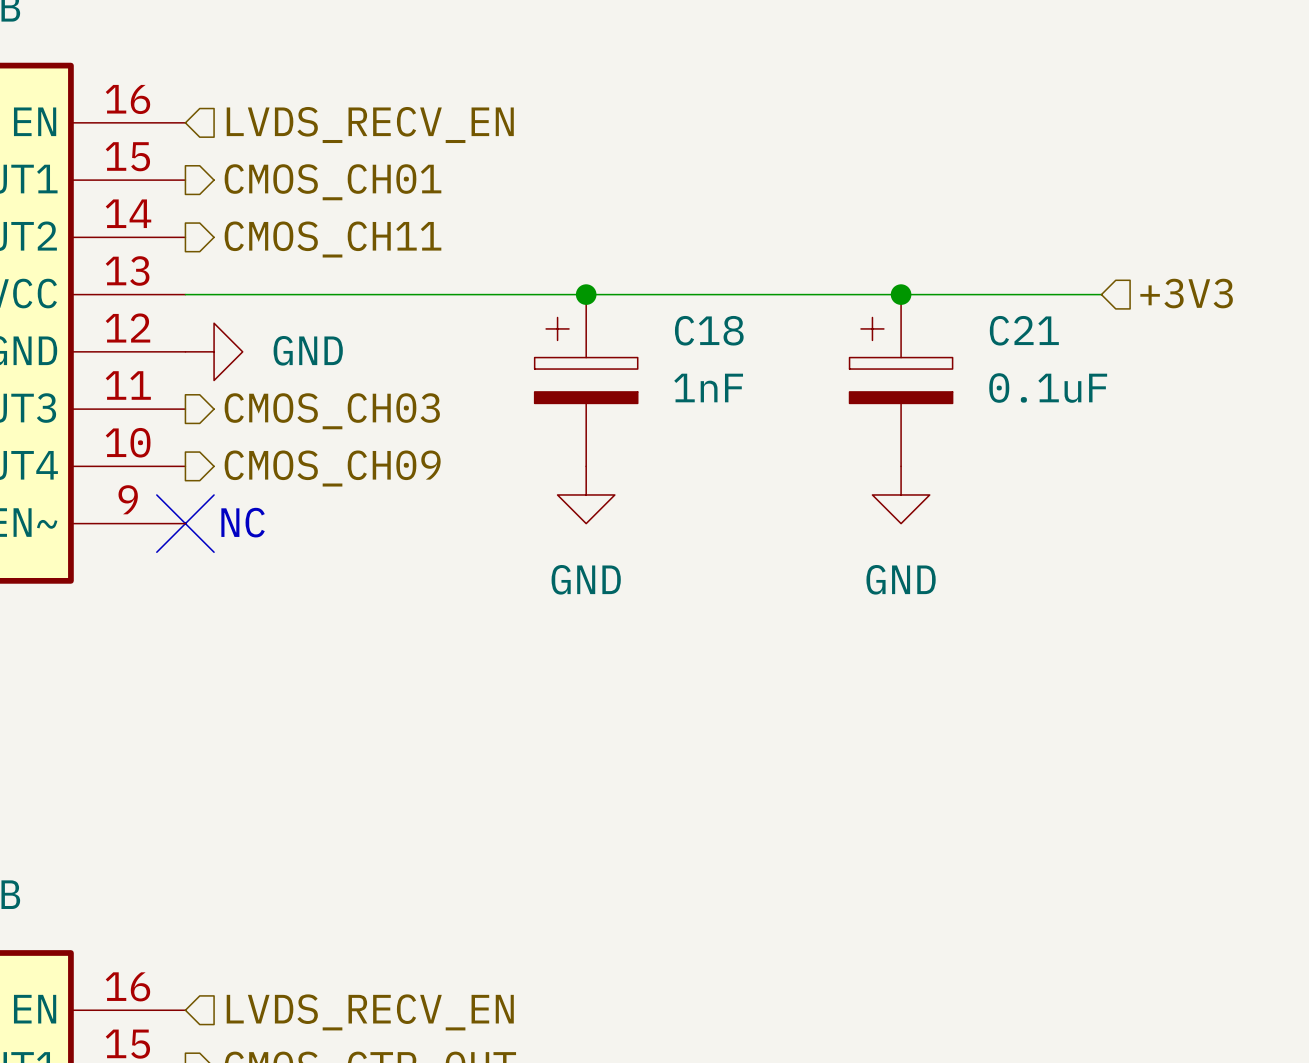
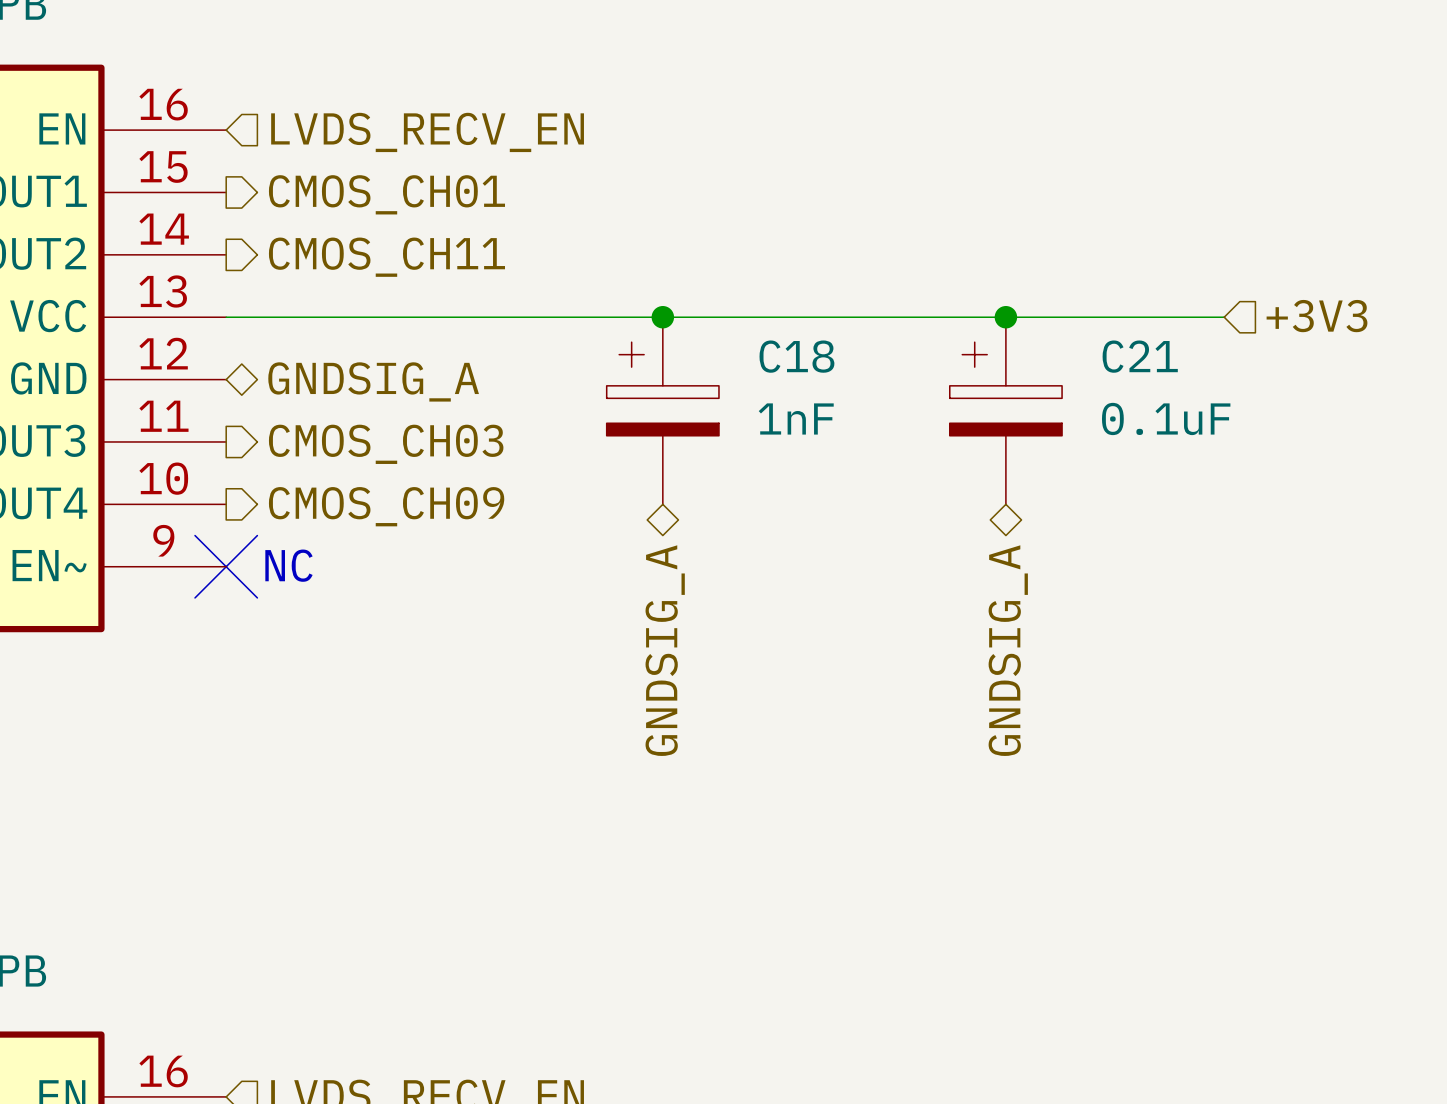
power symbol: GND (214, 351) -> none
hierarchical label: none -> GNDSIG_A (373, 381)
power symbol: GND (586, 494) -> none
power symbol: GND (901, 494) -> none
hierarchical label: none -> GNDSIG_A (665, 650)
hierarchical label: none -> GNDSIG_A (1008, 650)

